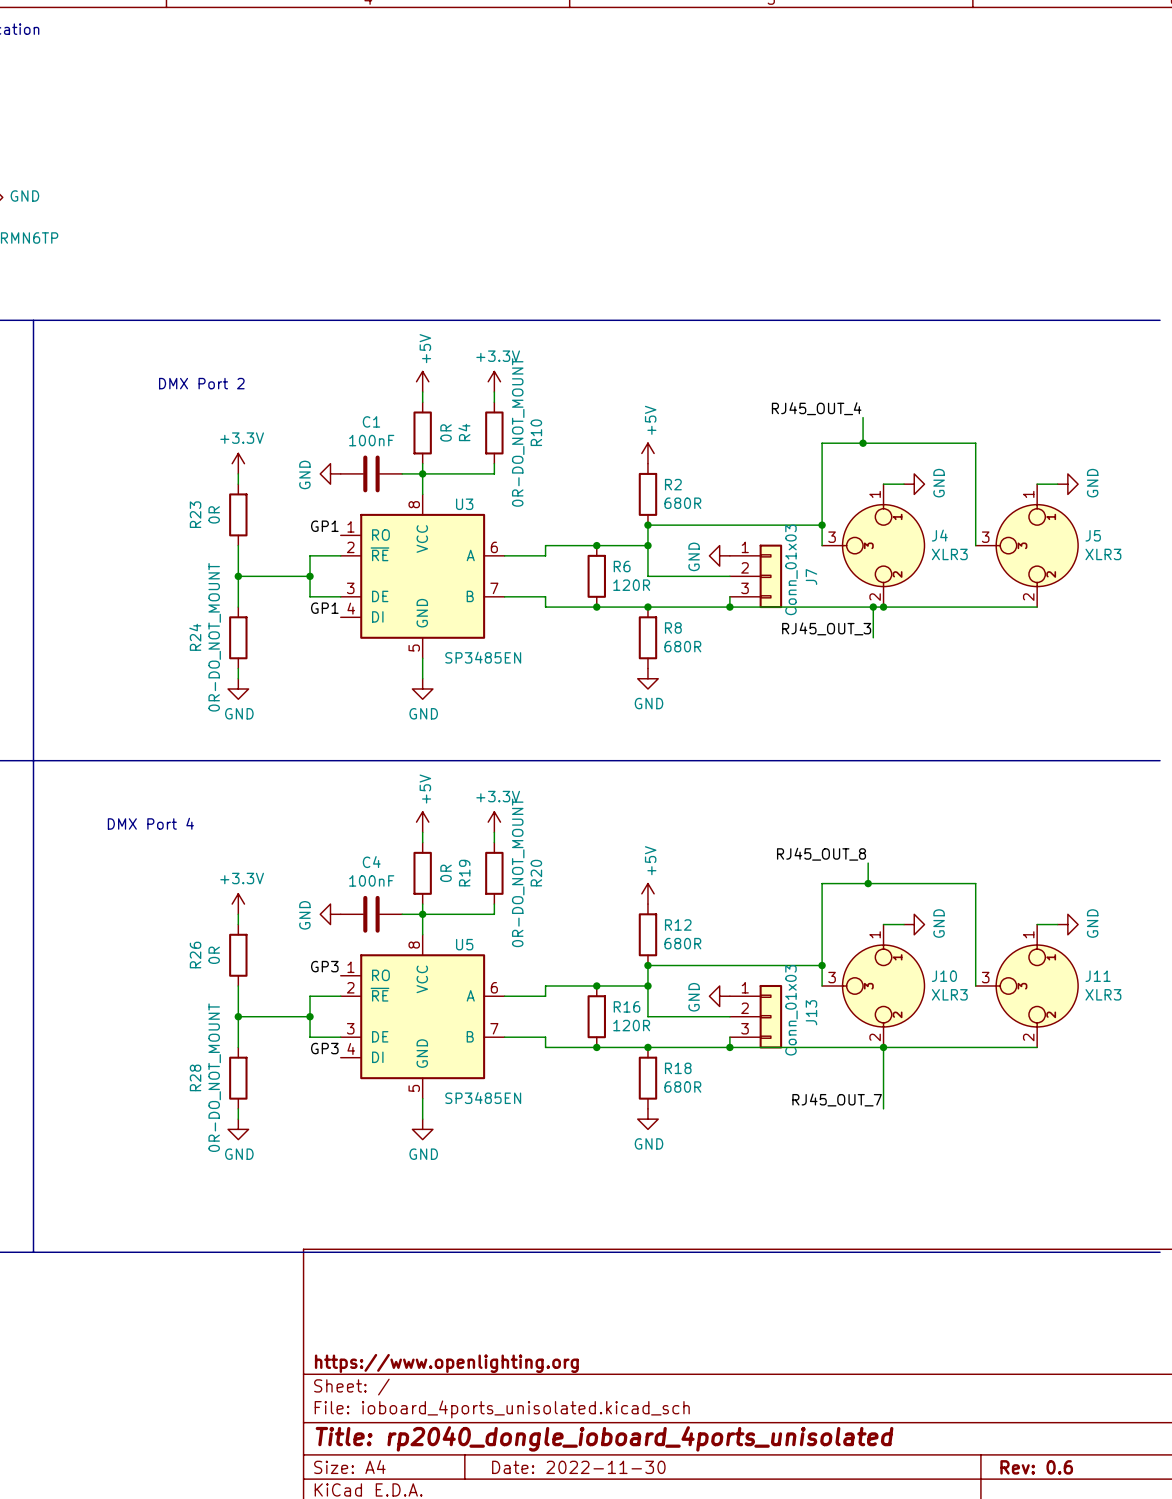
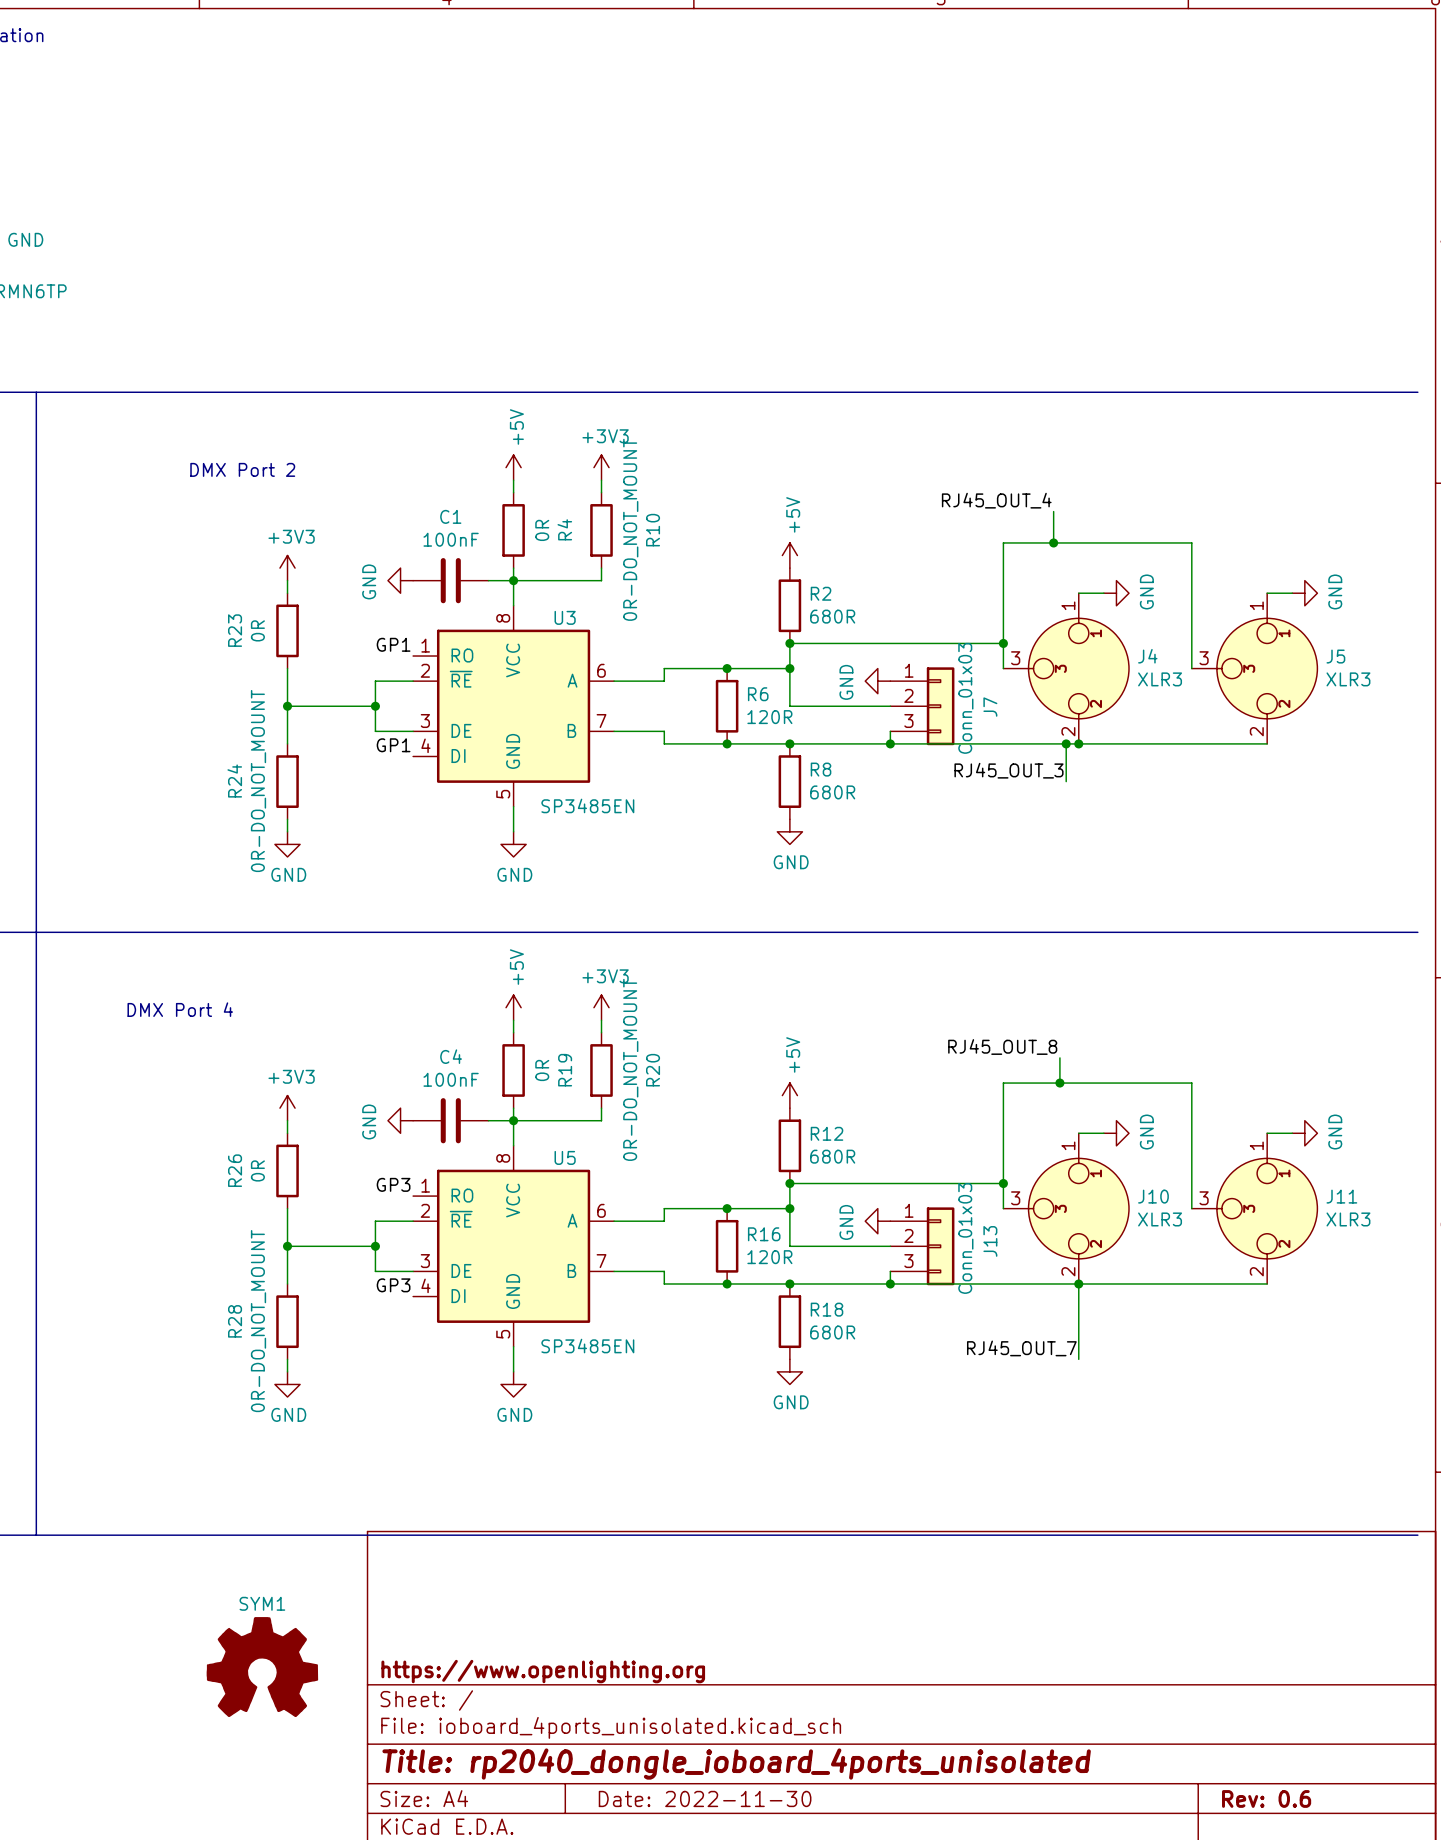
power symbol: +3.3V (494, 381) -> +3V3 (601, 467)
power symbol: +3.3V (238, 463) -> +3V3 (287, 568)
power symbol: +3.3V (494, 822) -> +3V3 (601, 1007)
power symbol: +3.3V (238, 904) -> +3V3 (287, 1108)
SYM1: none -> (262, 1667)

